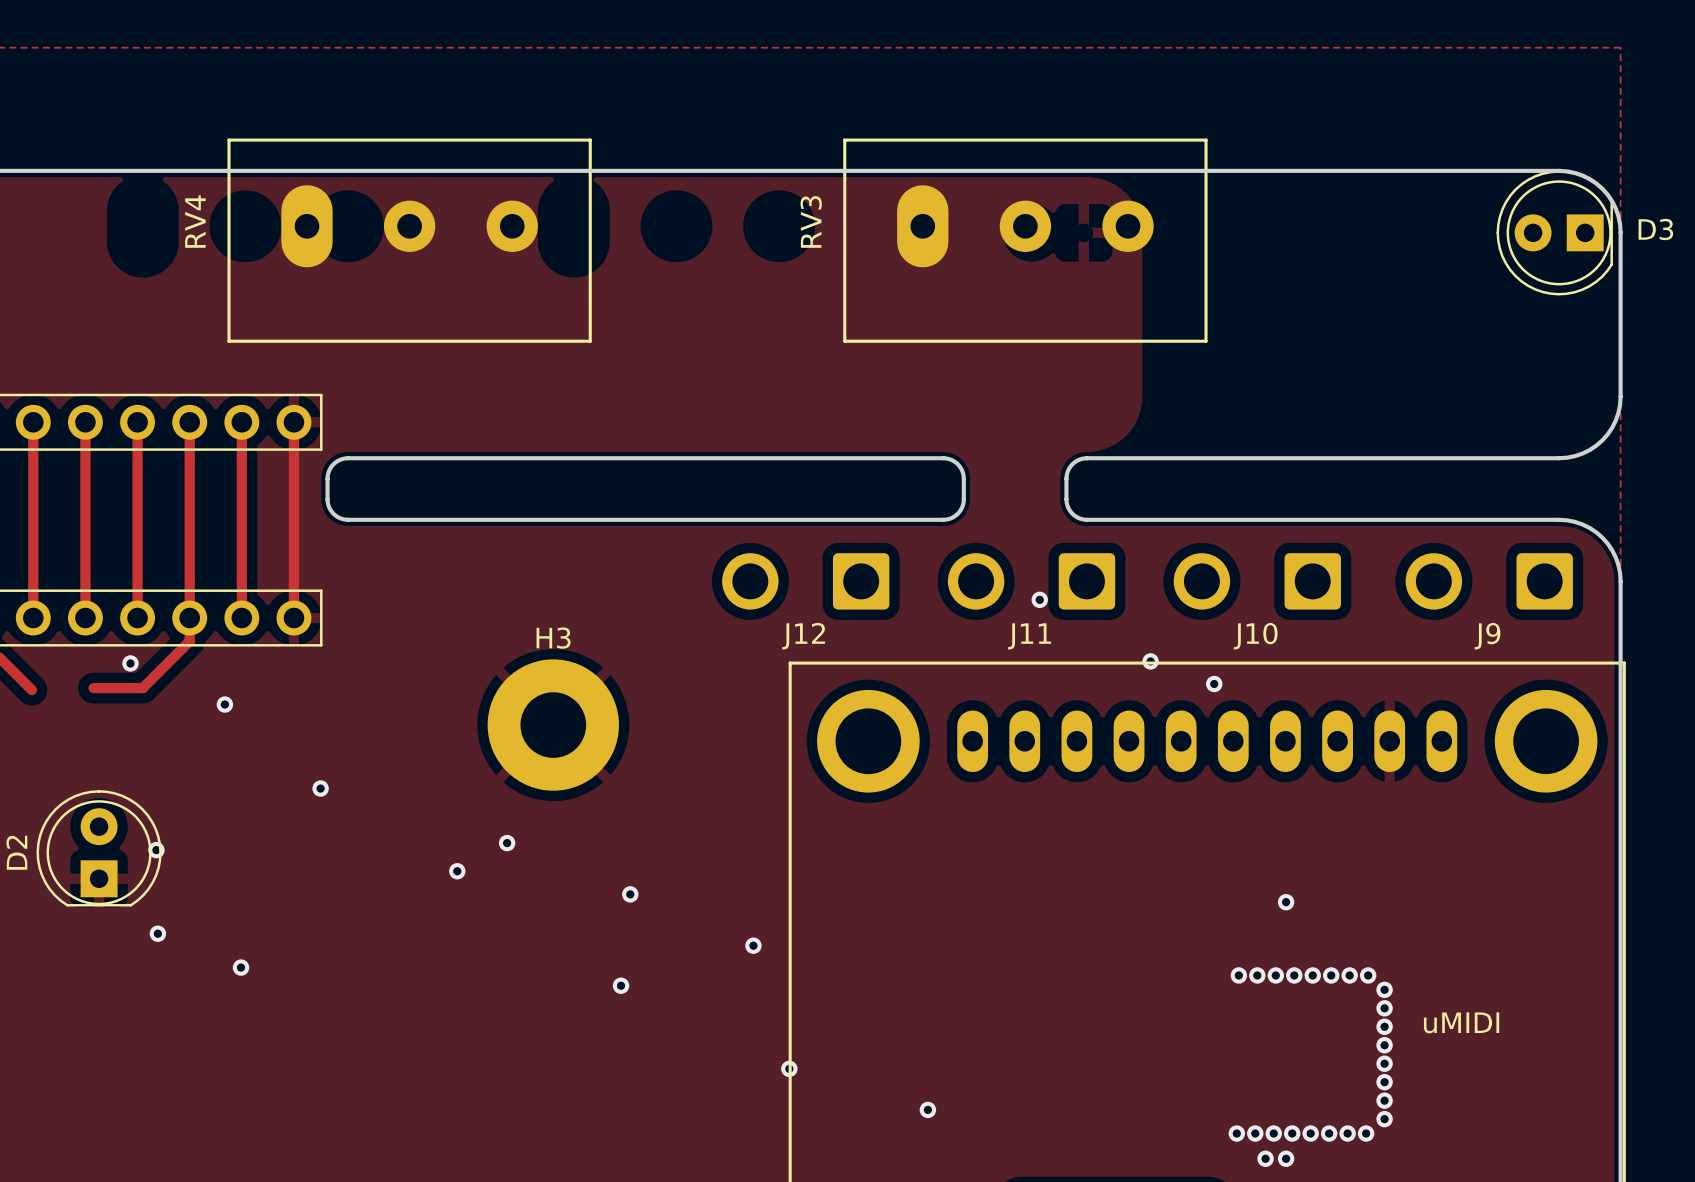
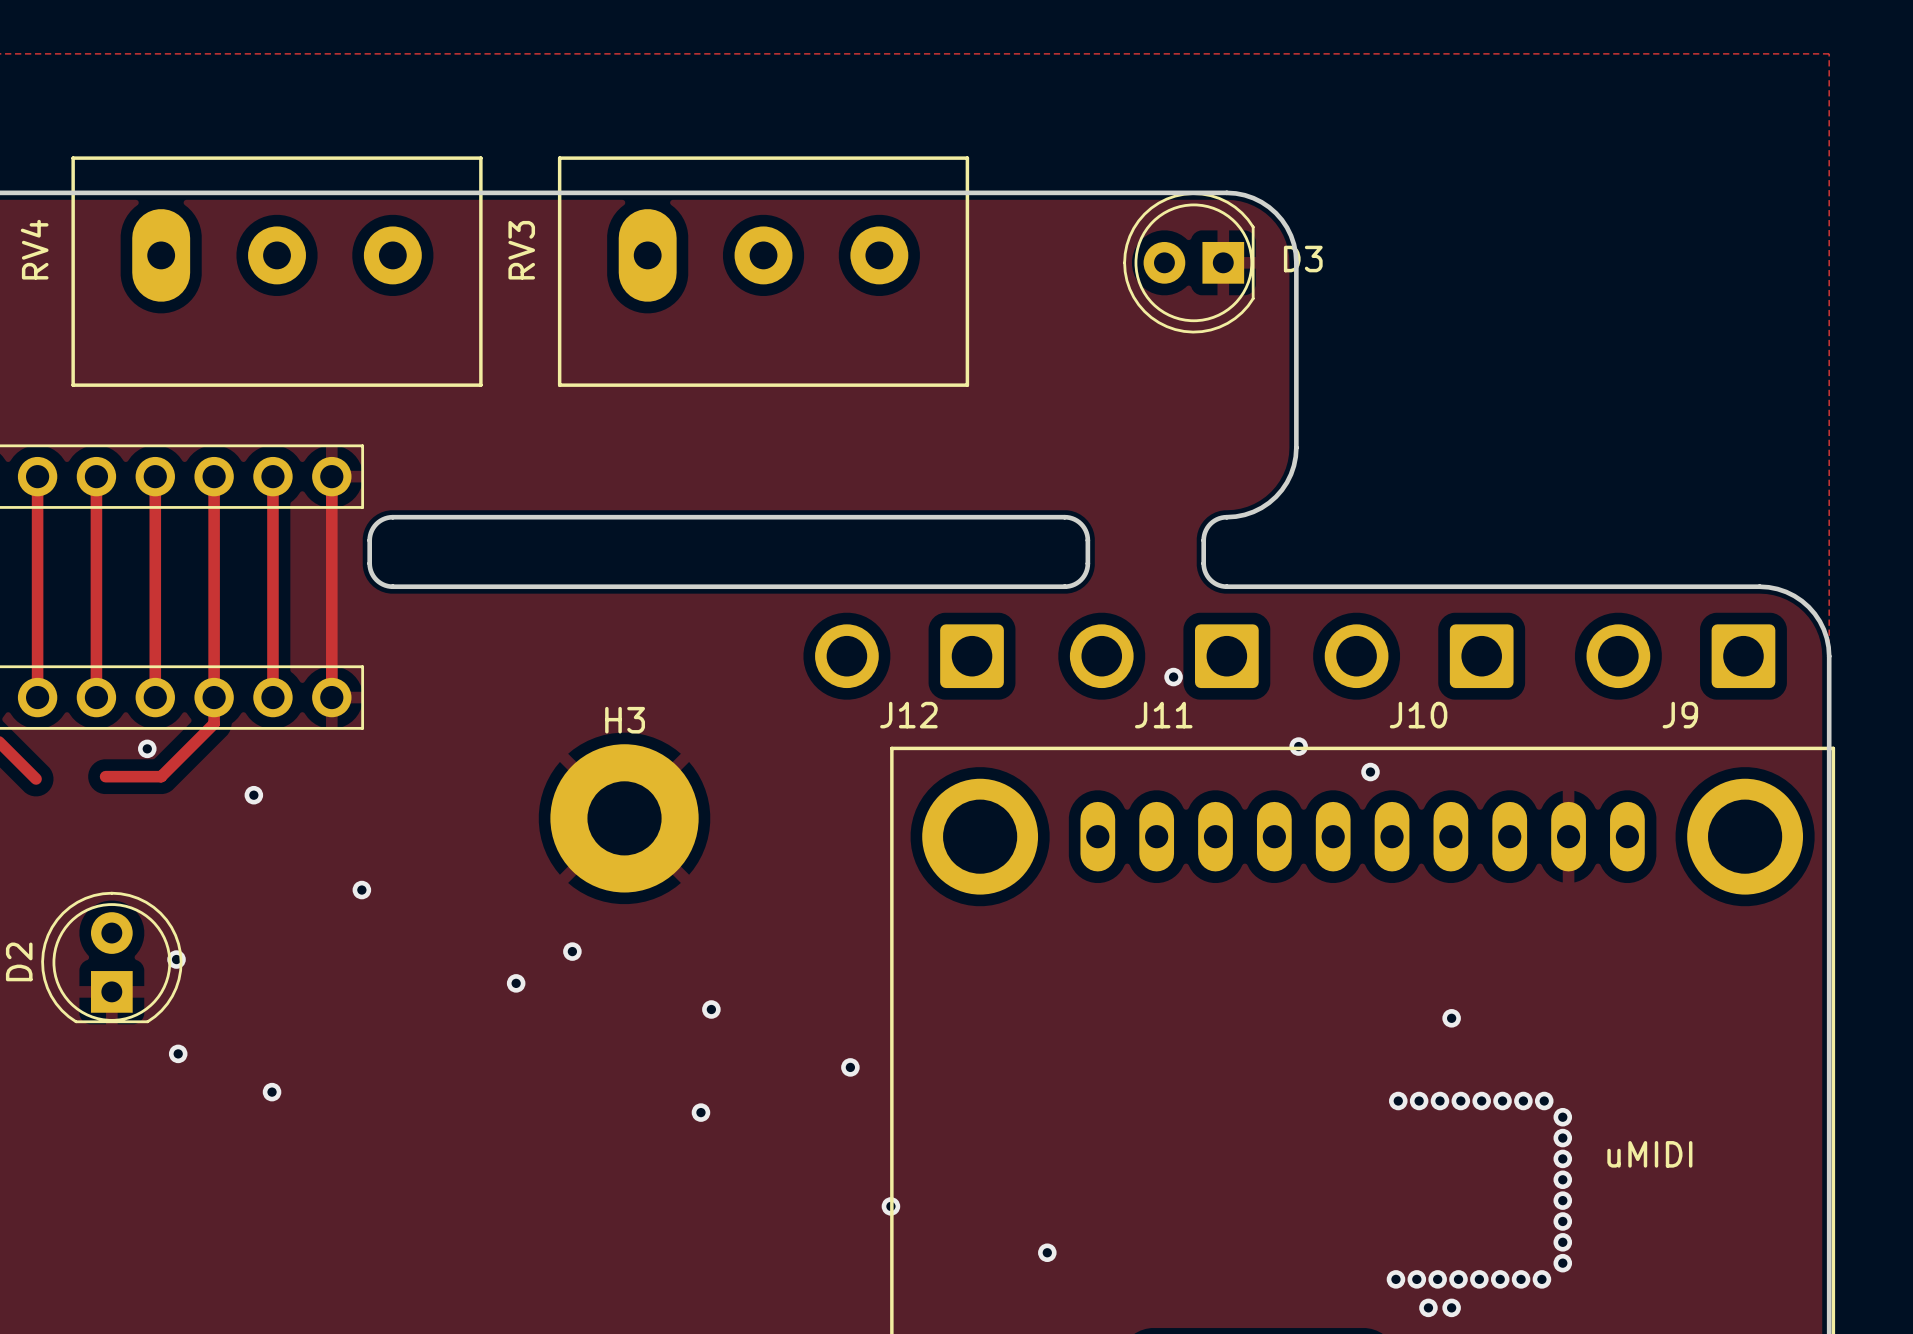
board edge: (1086, 170) (1567, 171) (1582, 175) (1602, 188) (1615, 208) (1620, 232) (1620, 404) (1615, 420) (1607, 434) (1596, 445) (1582, 453) (1559, 458) (1086, 458) -> (1226, 192) (1253, 198) (1276, 213) (1291, 235) (1296, 262) (1296, 447) (1293, 465) (1281, 490) (1269, 502) (1244, 514) (1226, 517)
D3 position: (1554, 232) -> (1188, 262)
RV4 position: (409, 240) -> (277, 271)
RV3 position: (1025, 240) -> (763, 271)

